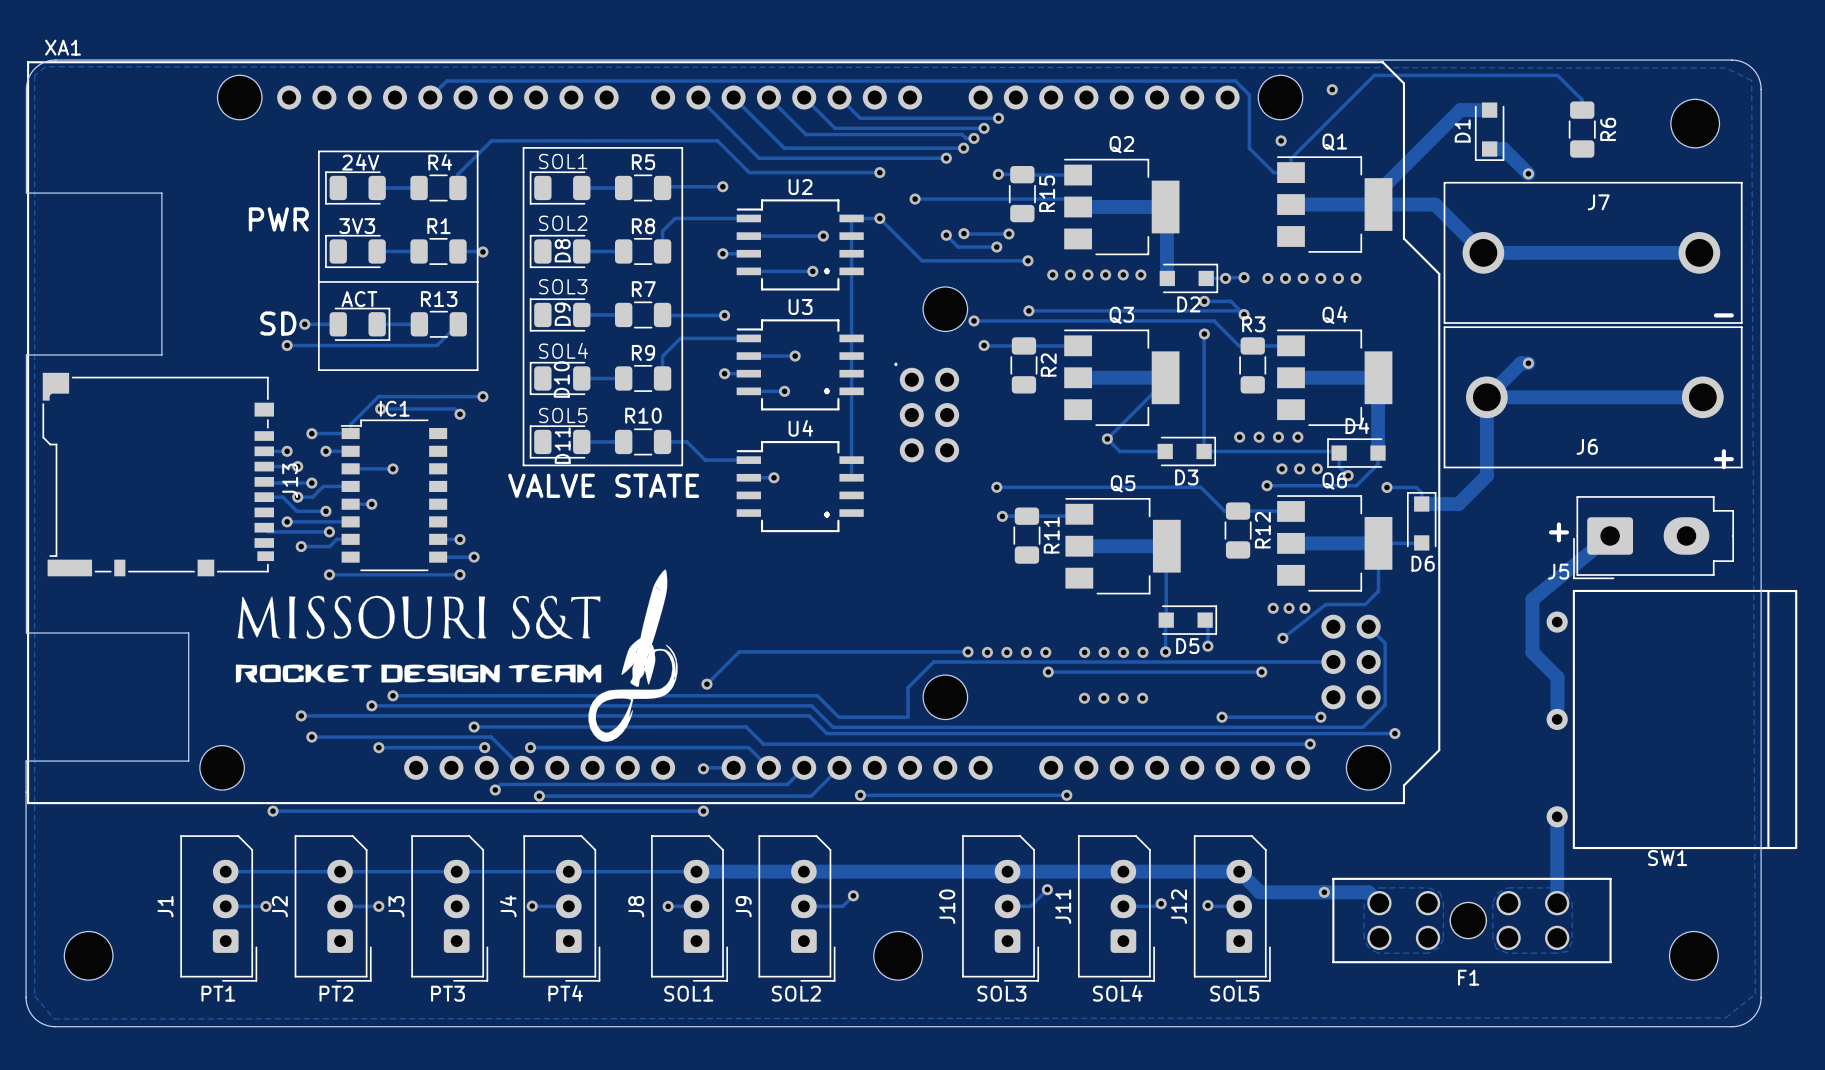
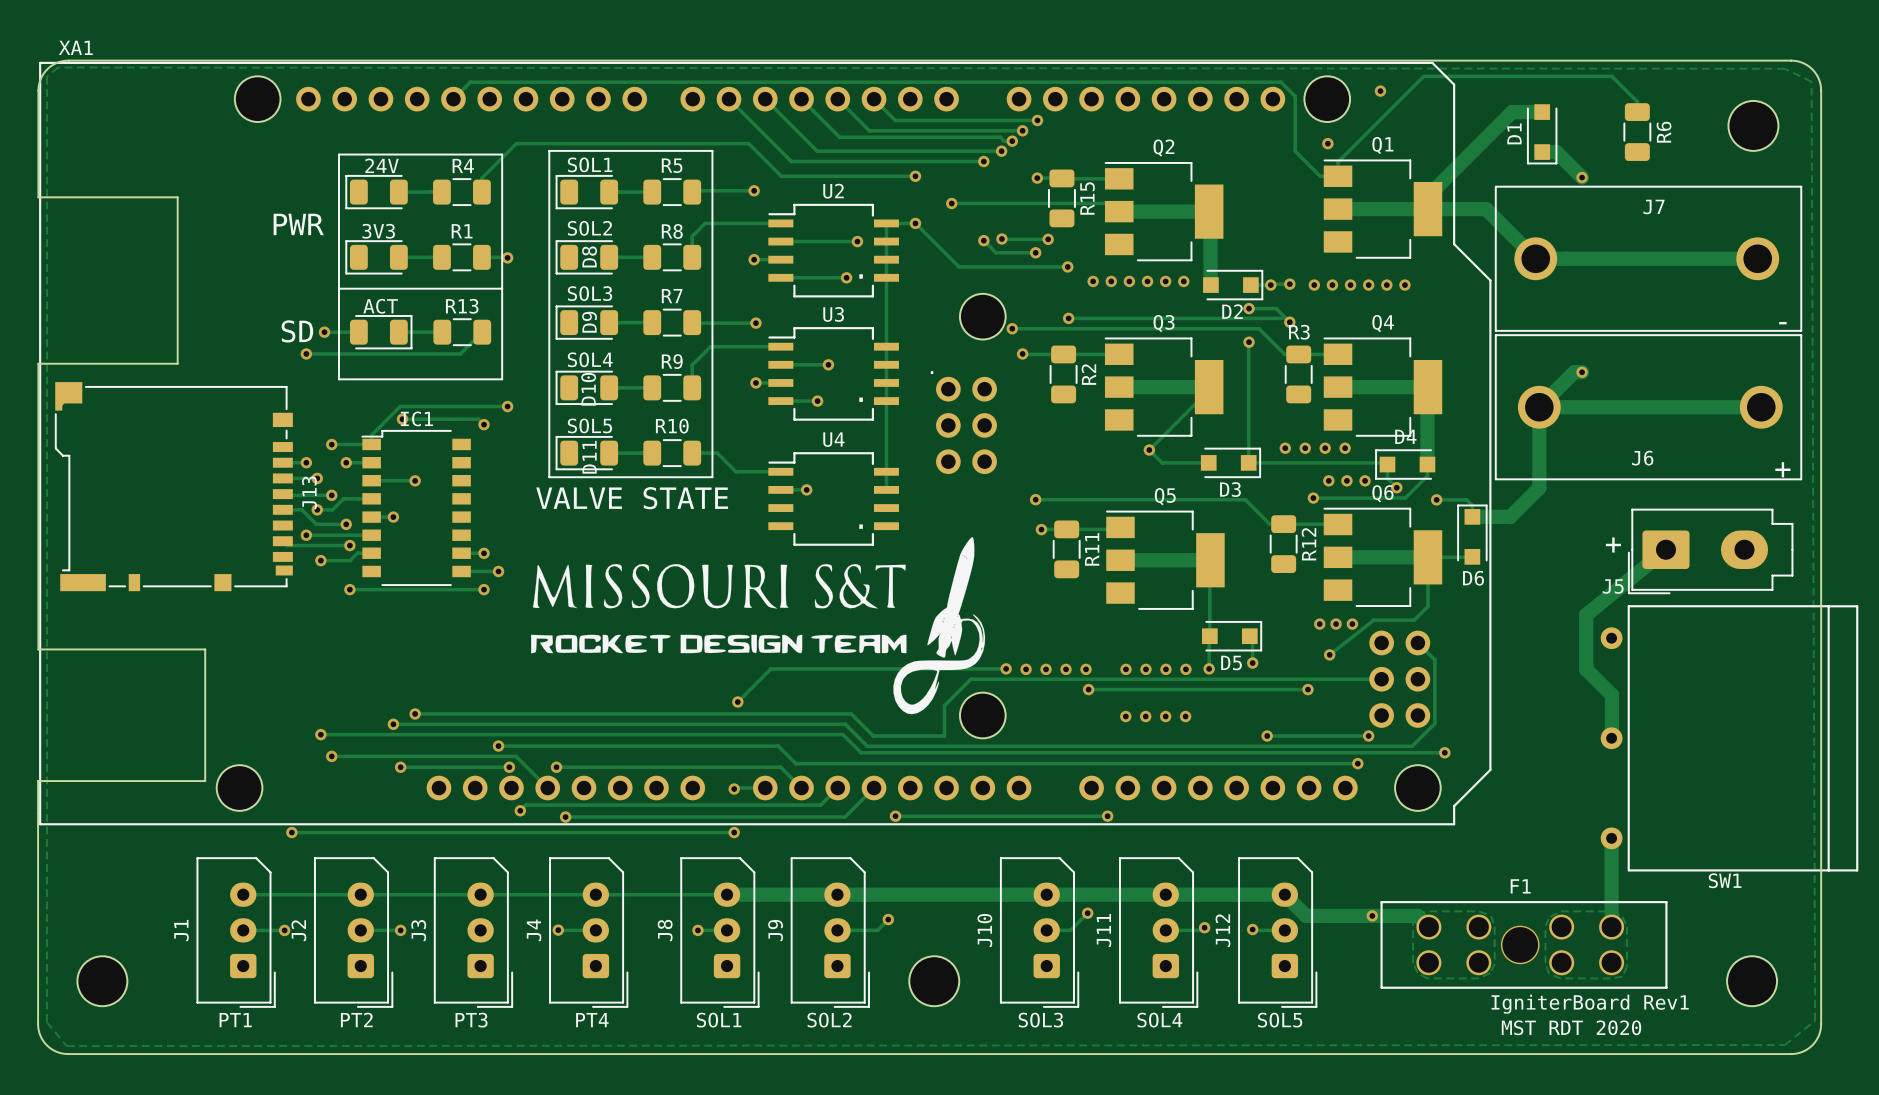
drawing position: (456, 655) -> (758, 625)
F1 name position: F1 (1468, 977) -> F1 (1520, 886)
text: none -> IgniterBoard Rev1 (1590, 1004)
text: none -> MST RDT 2020 (1571, 1027)

